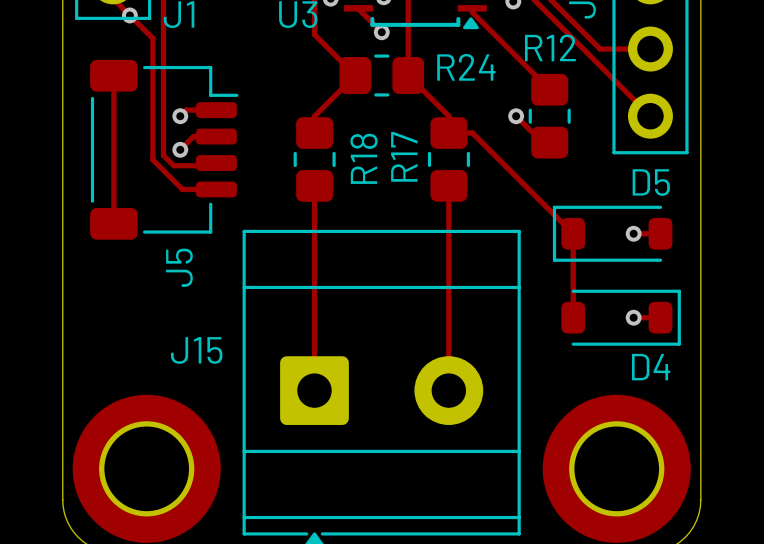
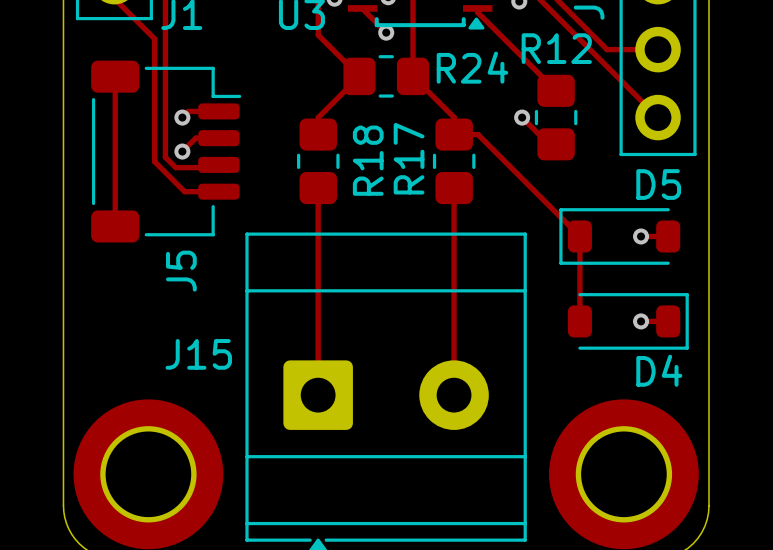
via: (129, 15) -> none

